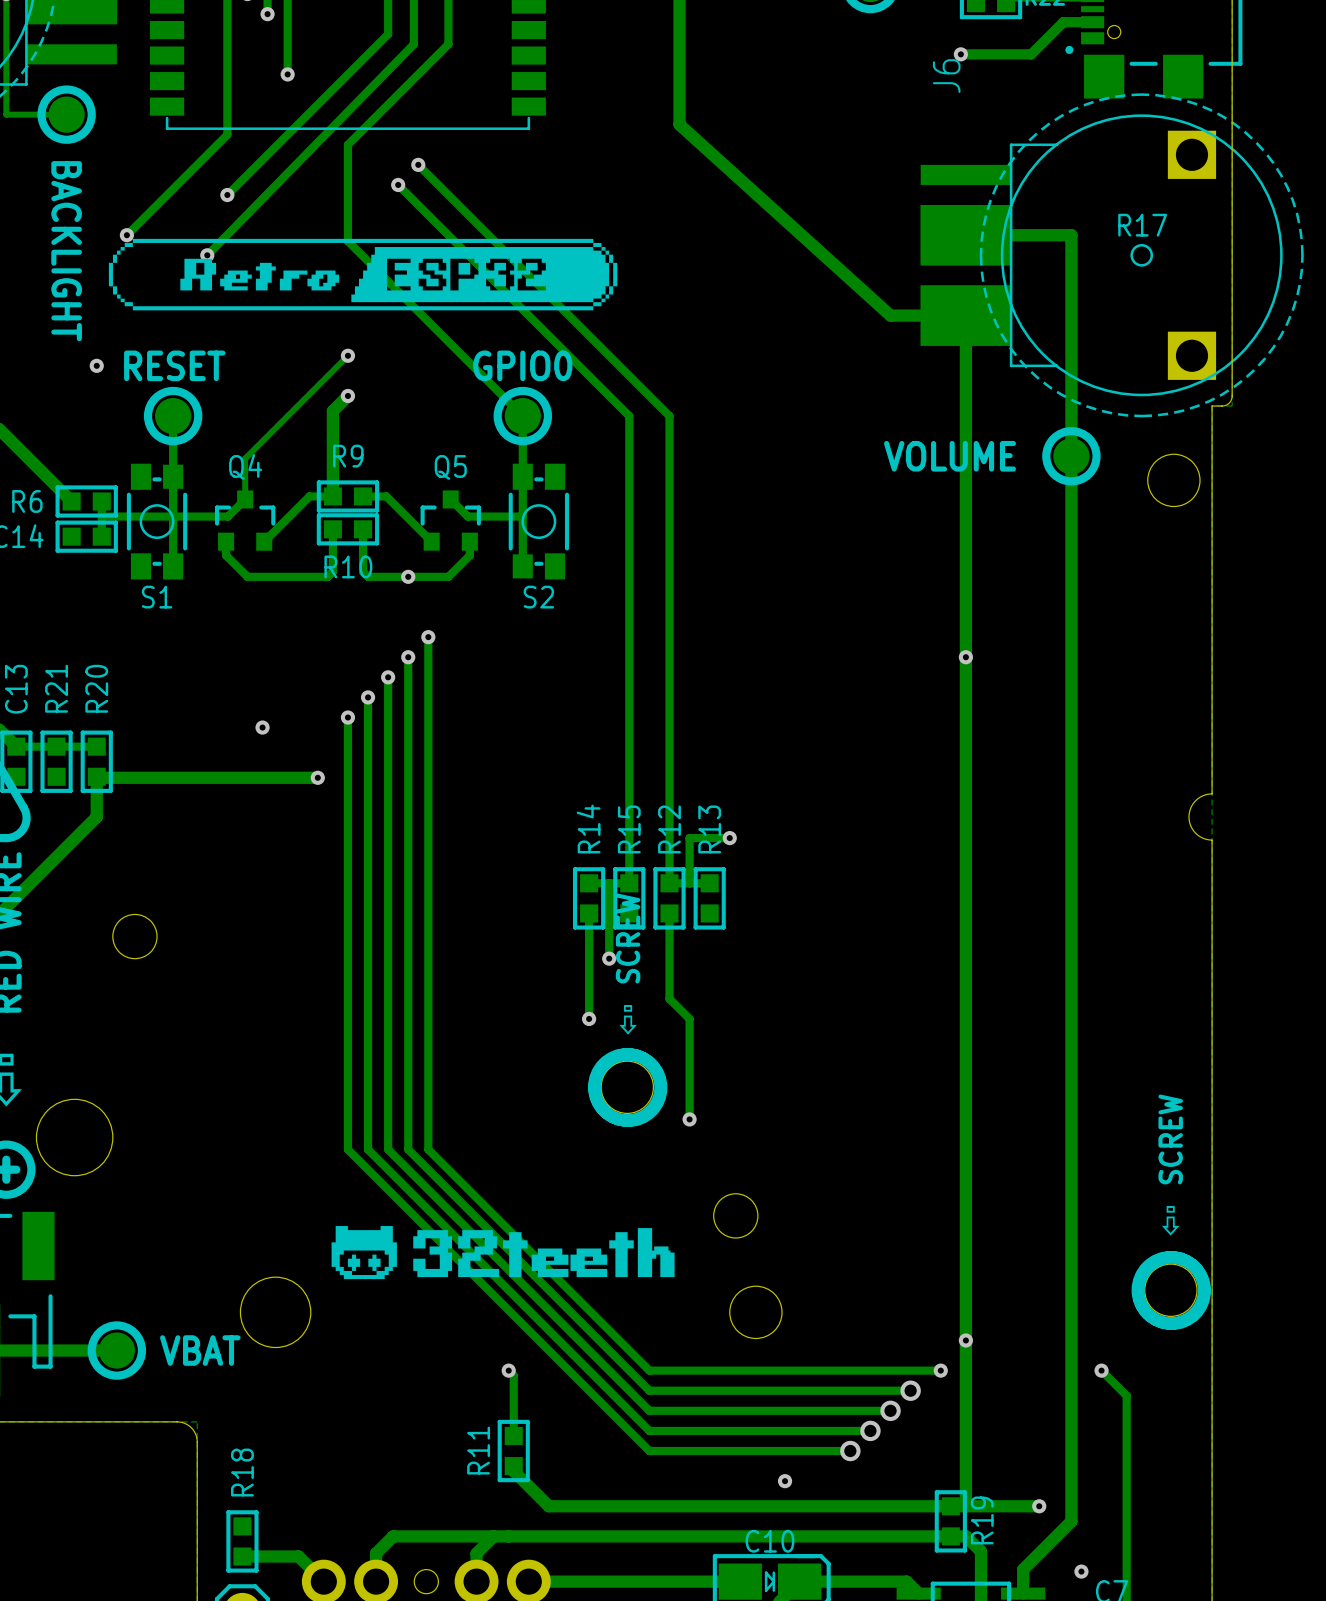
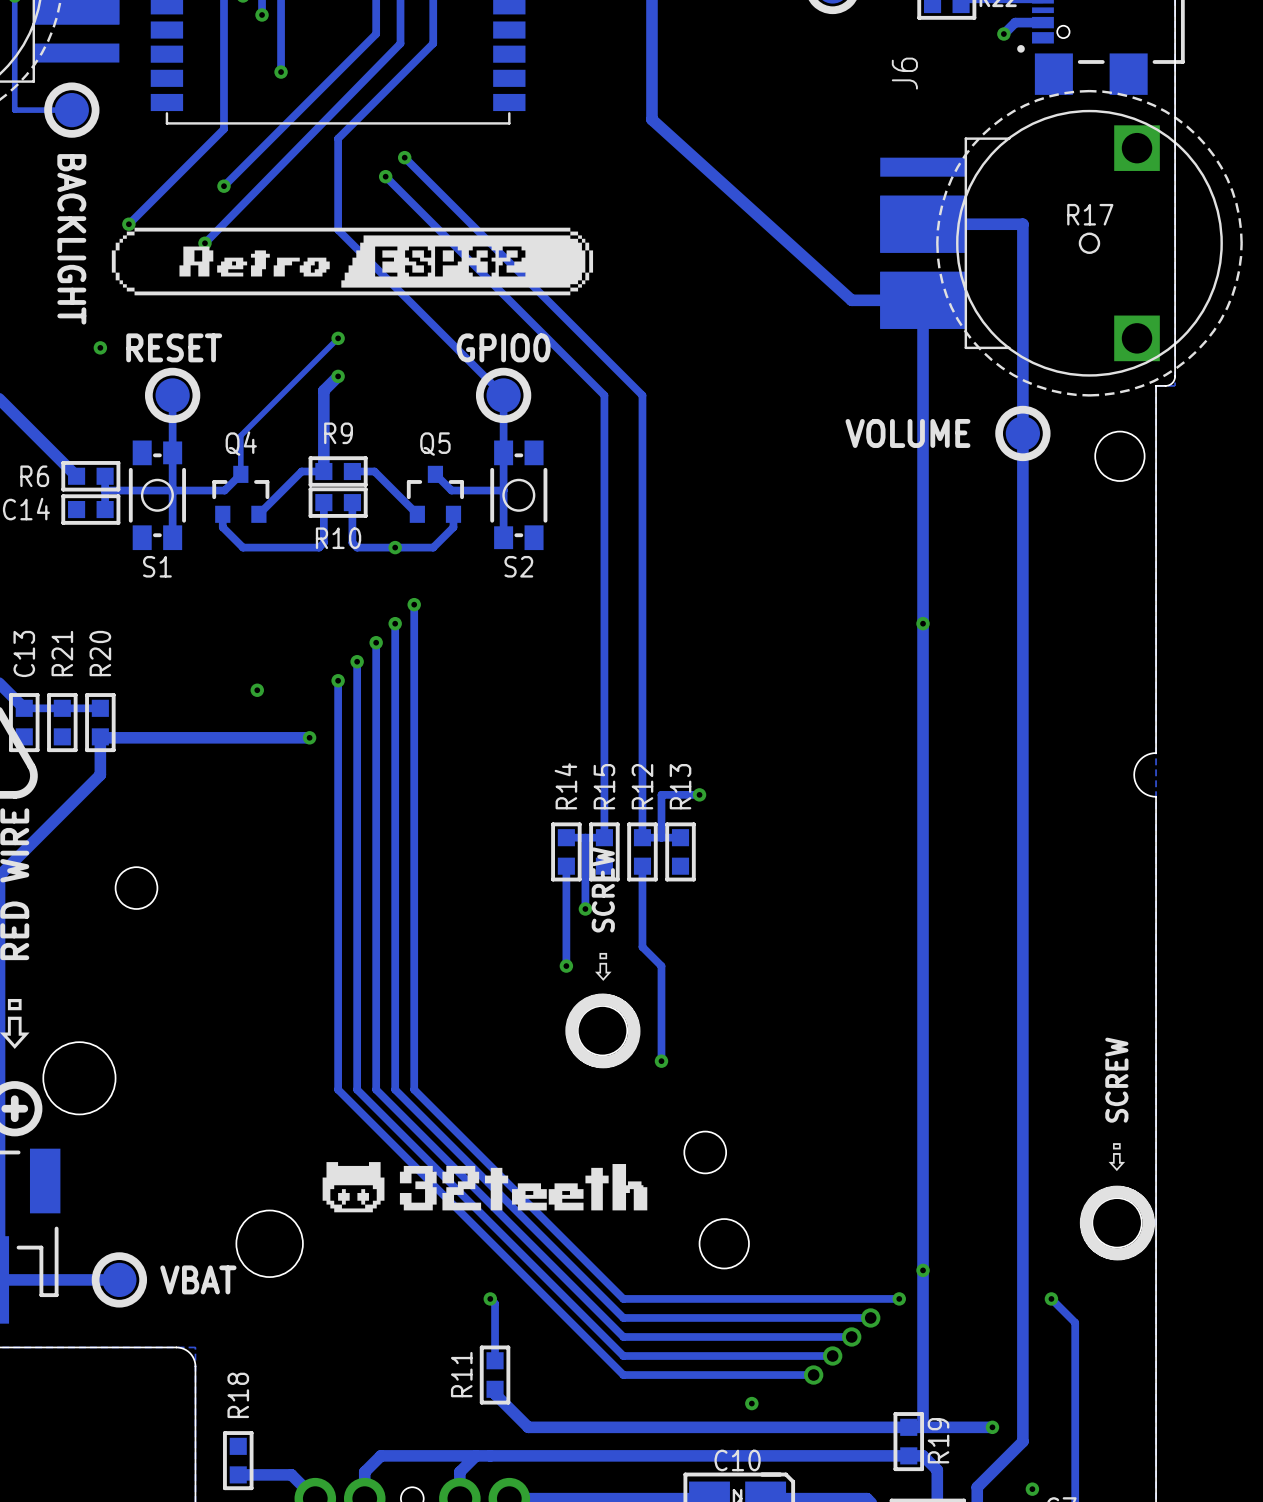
track: (1051, 34) (1031, 54) (960, 54) -> none
via position: (960, 54) -> (1003, 34)

